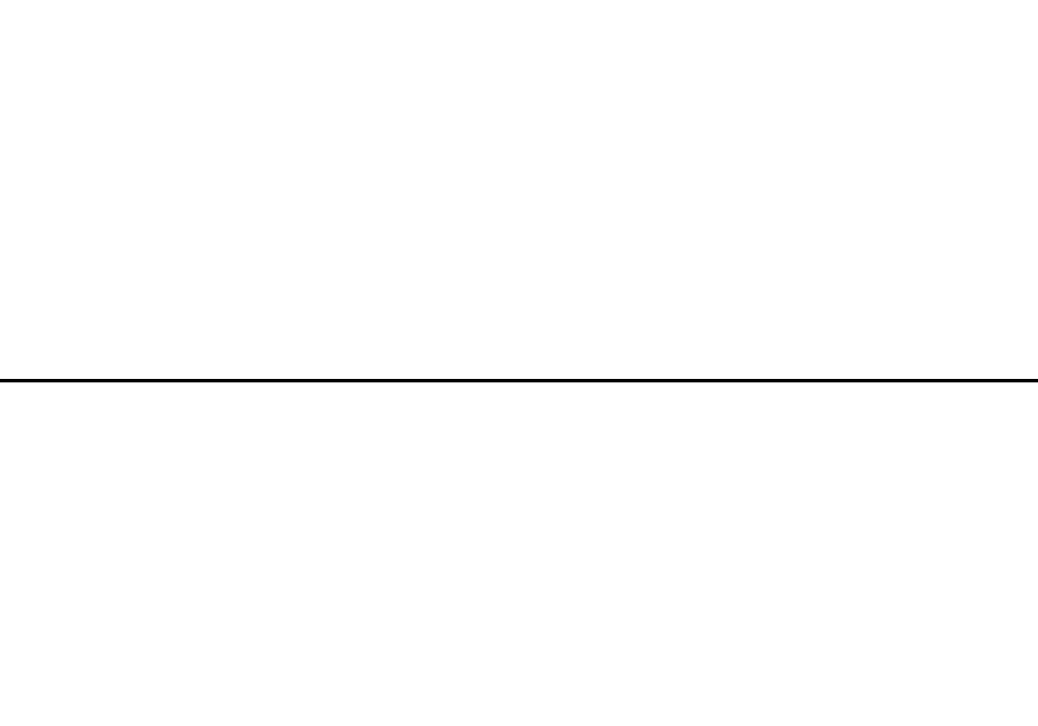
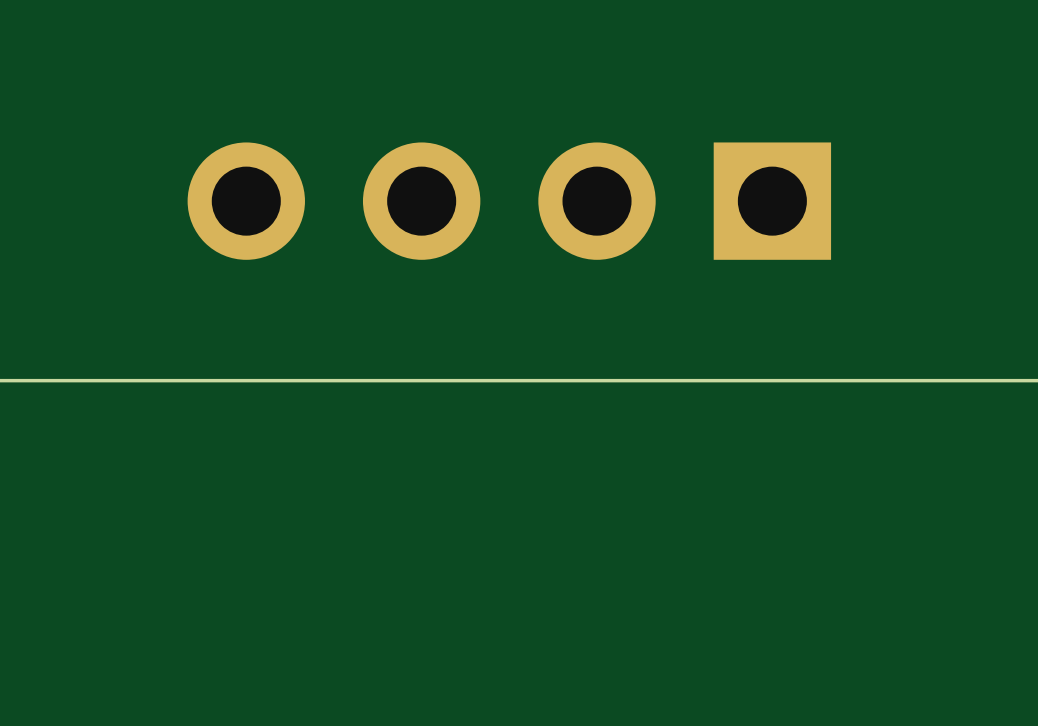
part: none -> (509, 201)

